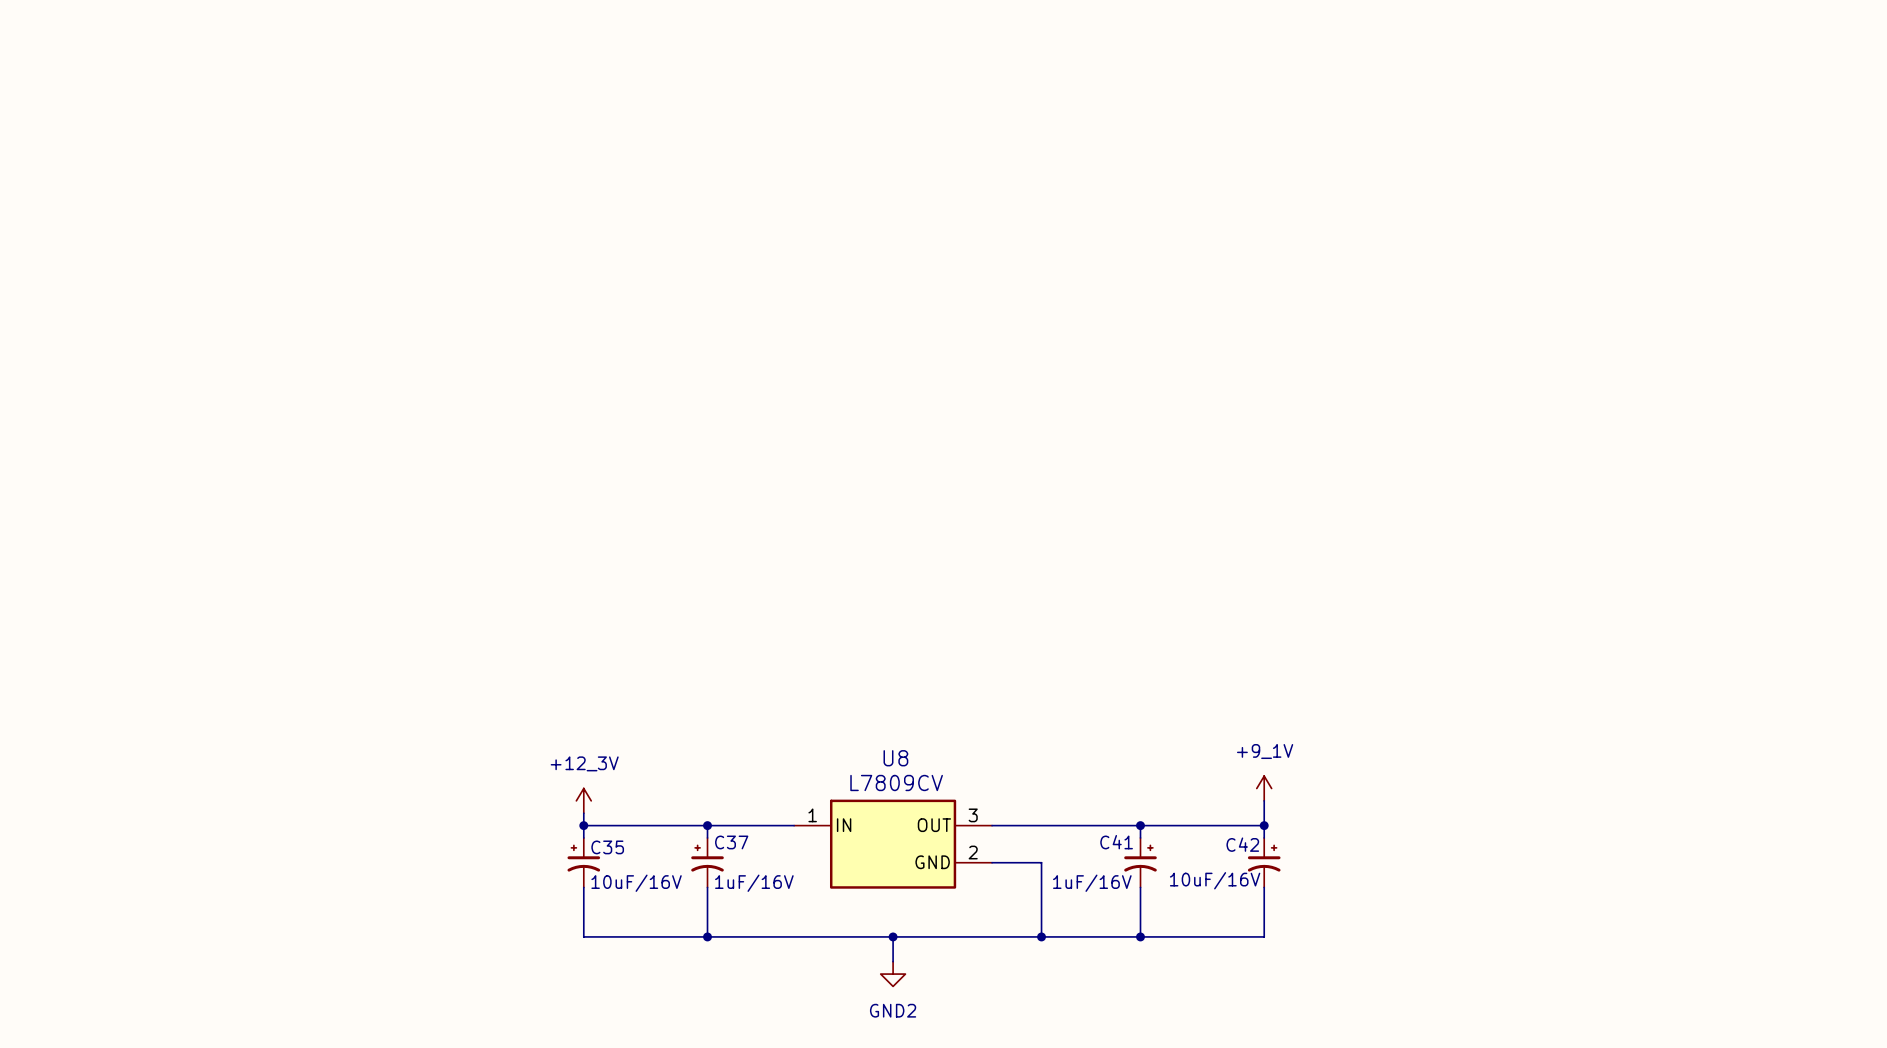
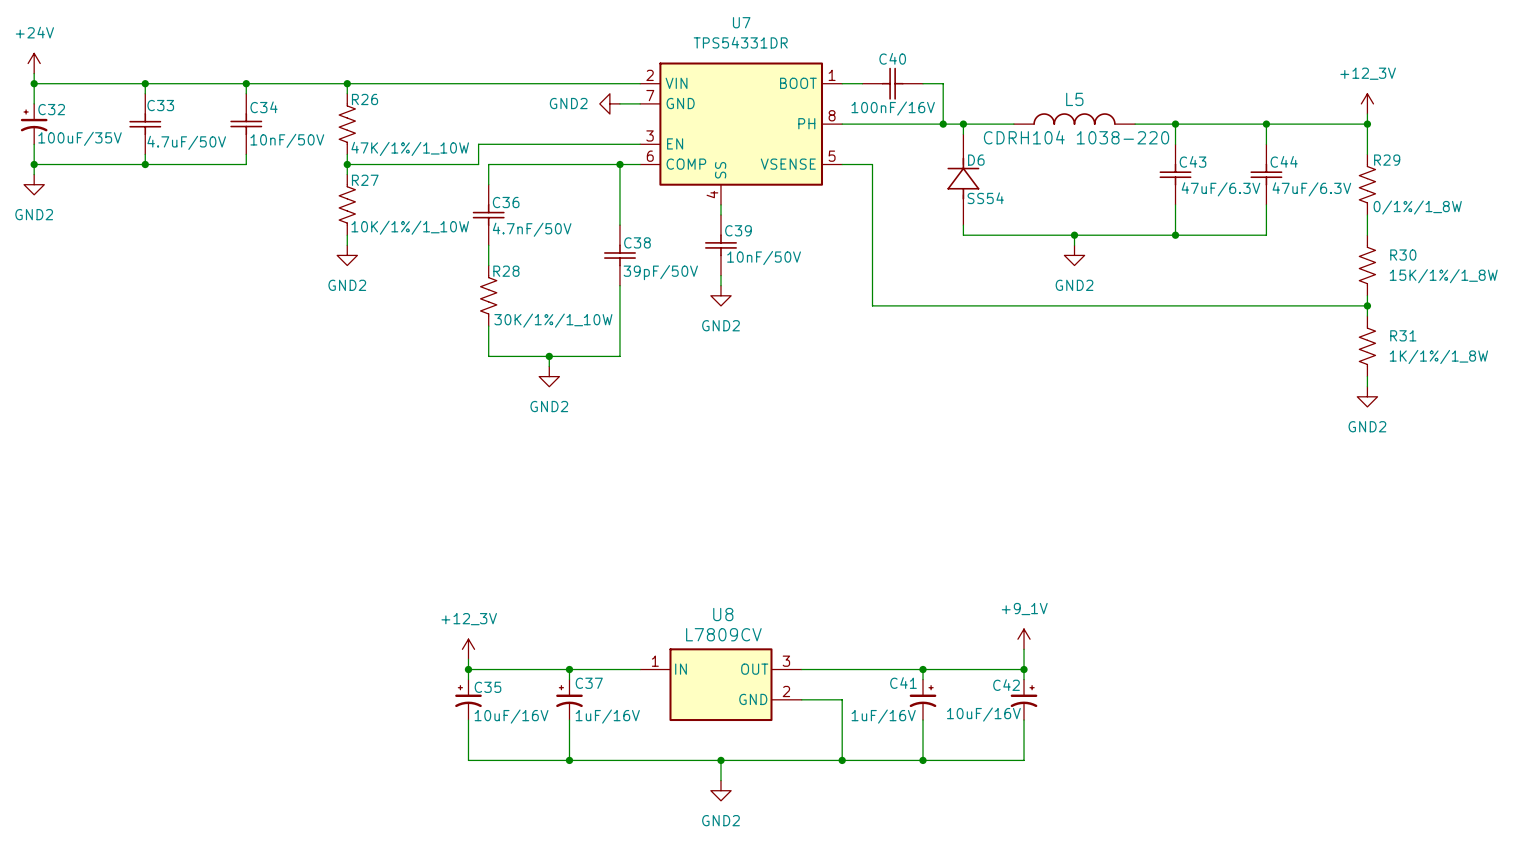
power symbol: none -> +24V (34, 63)
wire: none -> (34, 73) (34, 103)
wire: none -> (34, 83) (640, 83)
junction: none -> (34, 83)
wire: none -> (145, 83) (145, 93)
junction: none -> (145, 83)
wire: none -> (246, 83) (246, 93)
junction: none -> (246, 83)
wire: none -> (347, 83) (347, 93)
junction: none -> (347, 83)
wire: none -> (842, 83) (862, 83)
C40: none -> 100nF/16V (892, 83)
wire: none -> (923, 83) (943, 83) (943, 124)
power symbol: none -> GND2 (609, 103)
wire: none -> (619, 103) (640, 103)
power symbol: none -> +12_3V (1367, 103)
wire: none -> (1367, 114) (1367, 154)
L5: none -> CDRH104 1038-220 (1074, 119)
C32: none -> 100uF/35V (34, 124)
C33: none -> 4.7uF/50V (145, 124)
C34: none -> 10nF/50V (246, 124)
R26: none -> 47K/1%/1_10W (347, 124)
wire: none -> (842, 124) (1013, 124)
junction: none -> (943, 124)
wire: none -> (963, 124) (963, 134)
junction: none -> (963, 124)
wire: none -> (1135, 124) (1367, 124)
wire: none -> (1175, 124) (1175, 144)
junction: none -> (1175, 124)
wire: none -> (1266, 124) (1266, 144)
junction: none -> (1266, 124)
junction: none -> (1367, 124)
U7: none -> TPS54331DR (741, 133)
wire: none -> (34, 144) (34, 174)
wire: none -> (640, 144) (478, 144) (478, 164) (347, 164)
wire: none -> (145, 154) (145, 164)
wire: none -> (246, 154) (246, 164) (34, 164)
wire: none -> (347, 154) (347, 174)
junction: none -> (34, 164)
junction: none -> (145, 164)
junction: none -> (347, 164)
wire: none -> (619, 164) (619, 225)
junction: none -> (619, 164)
wire: none -> (640, 164) (488, 164) (488, 184)
wire: none -> (842, 164) (872, 164) (872, 305) (1367, 305)
C43: none -> 47uF/6.3V (1175, 174)
C44: none -> 47uF/6.3V (1266, 174)
D6: none -> SS54 (963, 179)
power symbol: none -> GND2 (34, 184)
R29: none -> 0/1%/1_8W (1367, 184)
R27: none -> 10K/1%/1_10W (347, 204)
wire: none -> (720, 204) (720, 215)
wire: none -> (1175, 204) (1175, 235)
wire: none -> (1266, 204) (1266, 235) (963, 235) (963, 225)
C36: none -> 4.7nF/50V (488, 215)
wire: none -> (1367, 215) (1367, 235)
wire: none -> (347, 235) (347, 245)
wire: none -> (1074, 235) (1074, 245)
junction: none -> (1074, 235)
junction: none -> (1175, 235)
wire: none -> (488, 245) (488, 265)
C39: none -> 10nF/50V (720, 245)
power symbol: none -> GND2 (347, 255)
C38: none -> 39pF/50V (619, 255)
power symbol: none -> GND2 (1074, 255)
R30: none -> 15K/1%/1_8W (1367, 265)
wire: none -> (720, 275) (720, 285)
wire: none -> (619, 285) (619, 356) (488, 356) (488, 326)
R28: none -> 30K/1%/1_10W (488, 295)
power symbol: none -> GND2 (720, 295)
wire: none -> (1367, 295) (1367, 316)
junction: none -> (1367, 305)
R31: none -> 1K/1%/1_8W (1367, 346)
wire: none -> (549, 356) (549, 366)
junction: none -> (549, 356)
power symbol: none -> GND2 (549, 376)
wire: none -> (1367, 376) (1367, 386)
power symbol: none -> GND2 (1367, 396)

